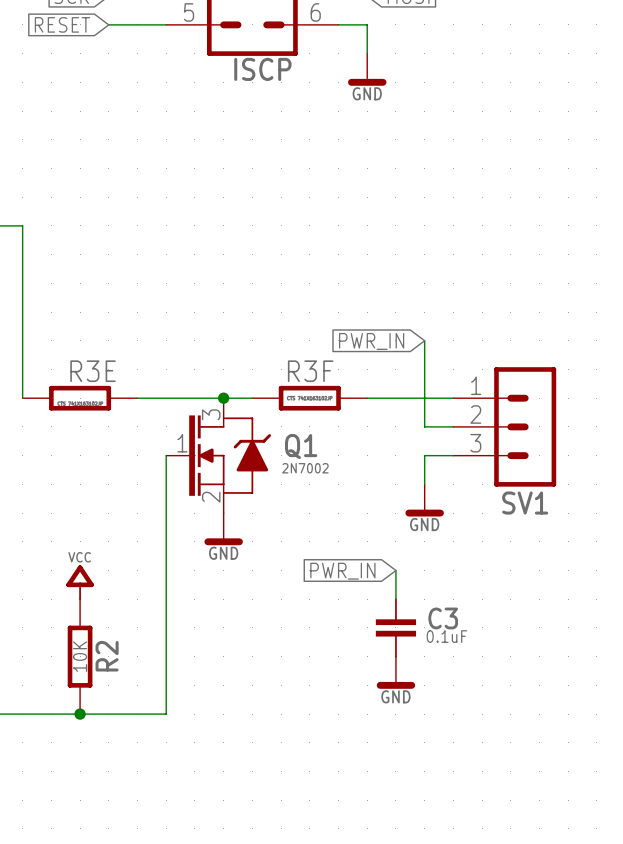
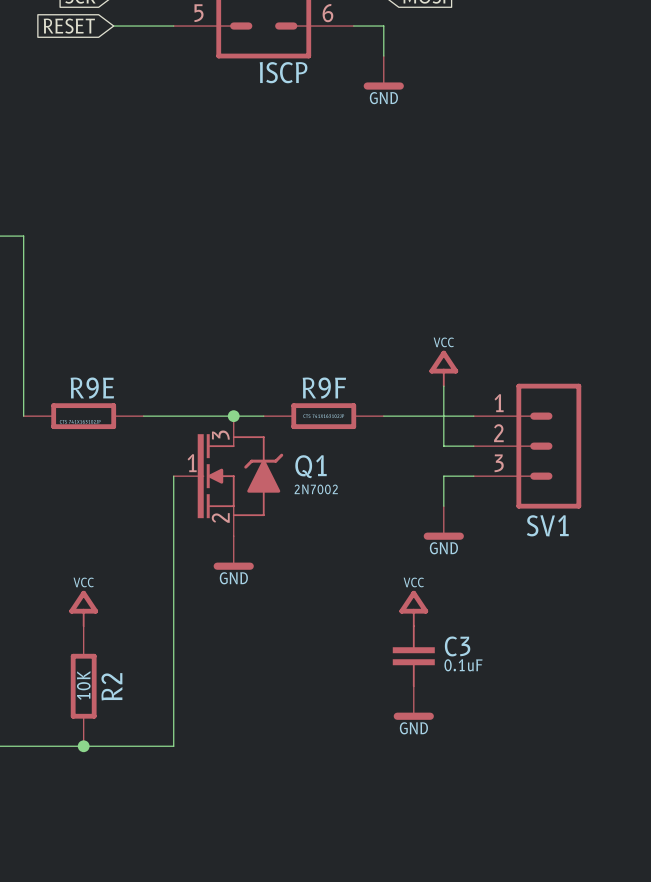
global label: PWR_IN (371, 341) -> none
power symbol: none -> VCC (443, 368)
R3E name: R3E (93, 371) -> R9E (92, 388)
R3F name: R3F (310, 371) -> R9F (324, 388)
global label: PWR_IN (342, 571) -> none
power symbol: none -> VCC (413, 608)

